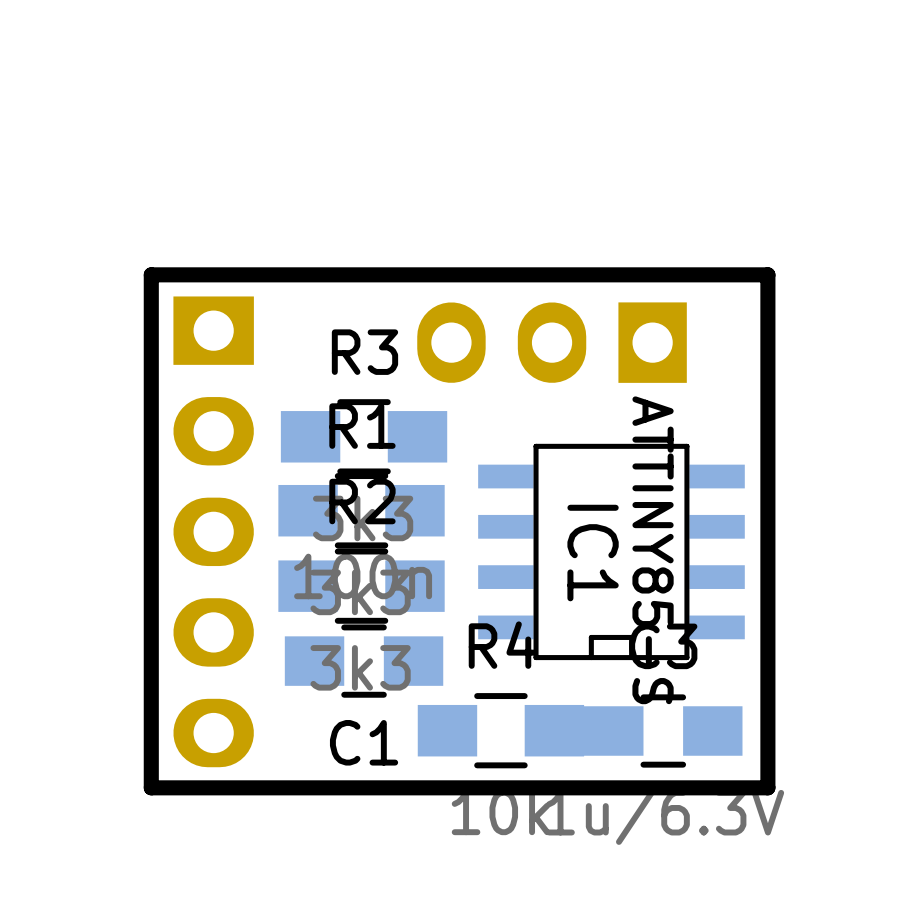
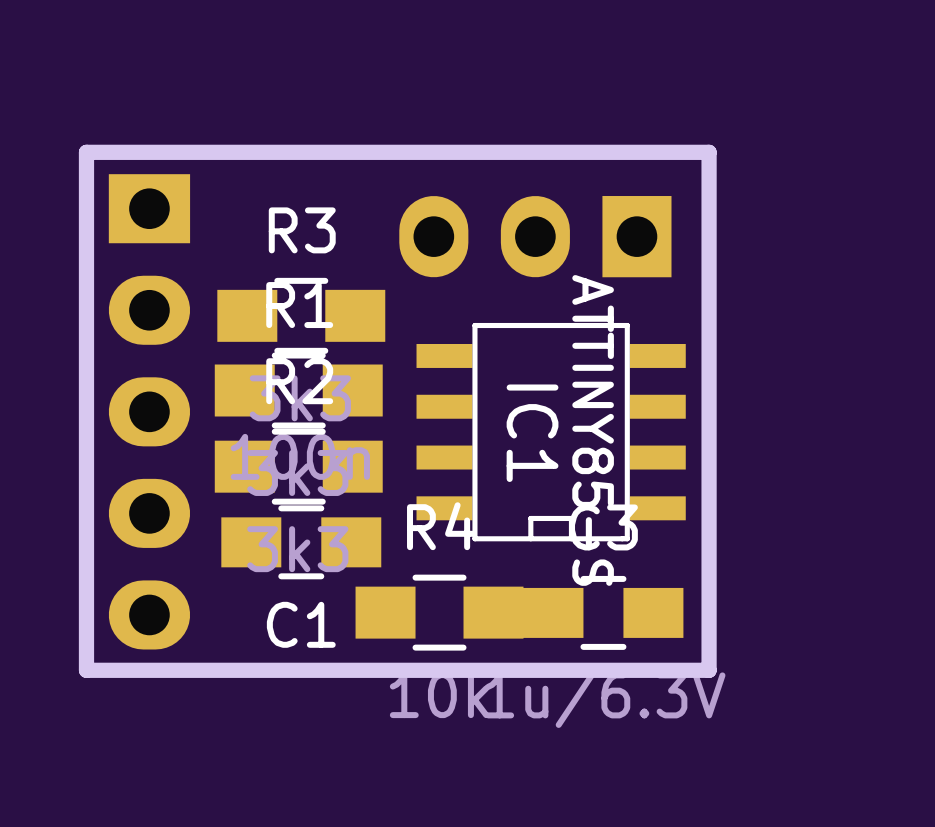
part position: (552, 342) -> (535, 236)

